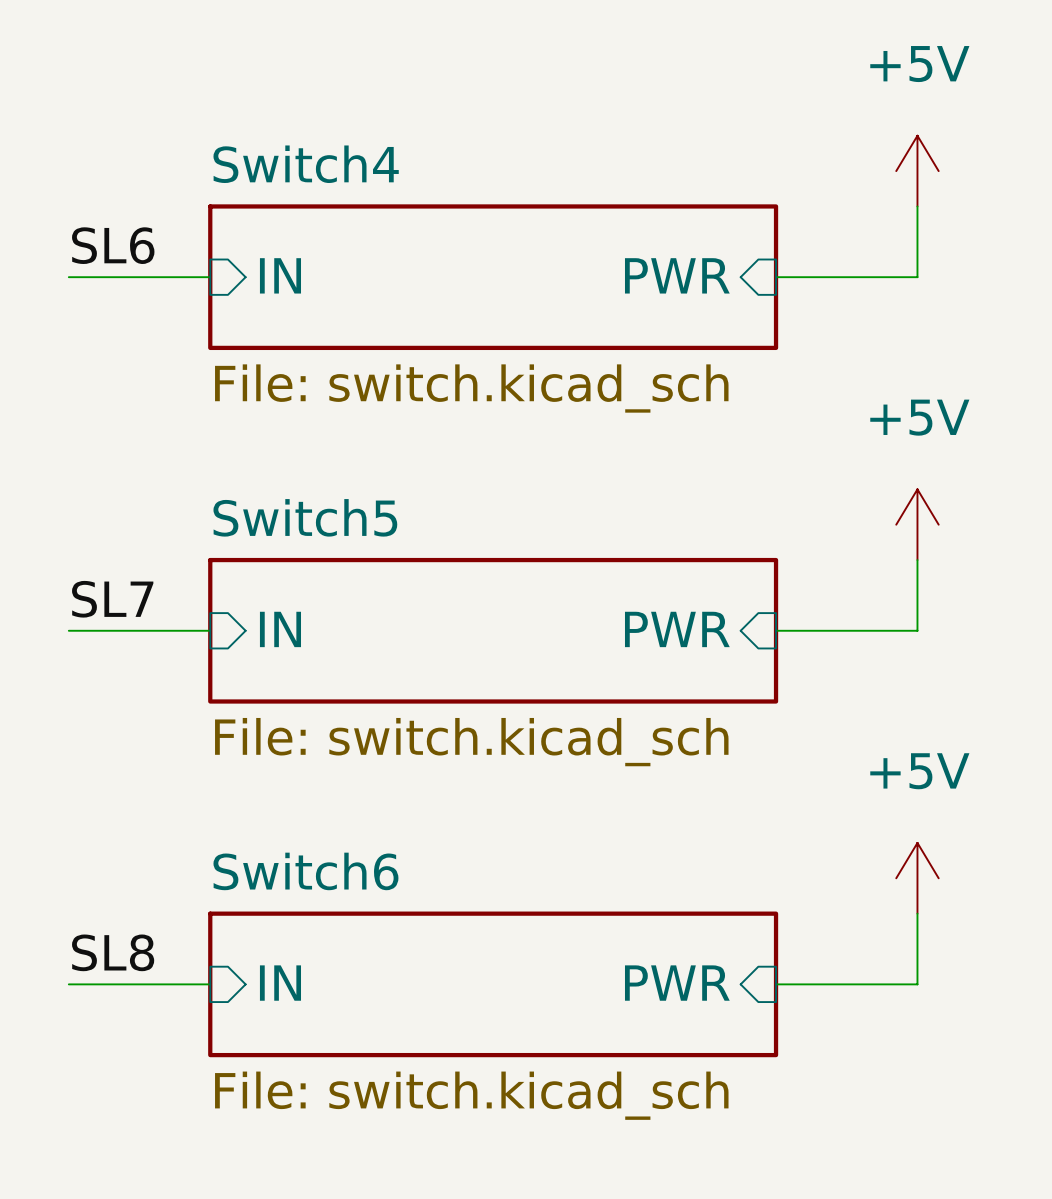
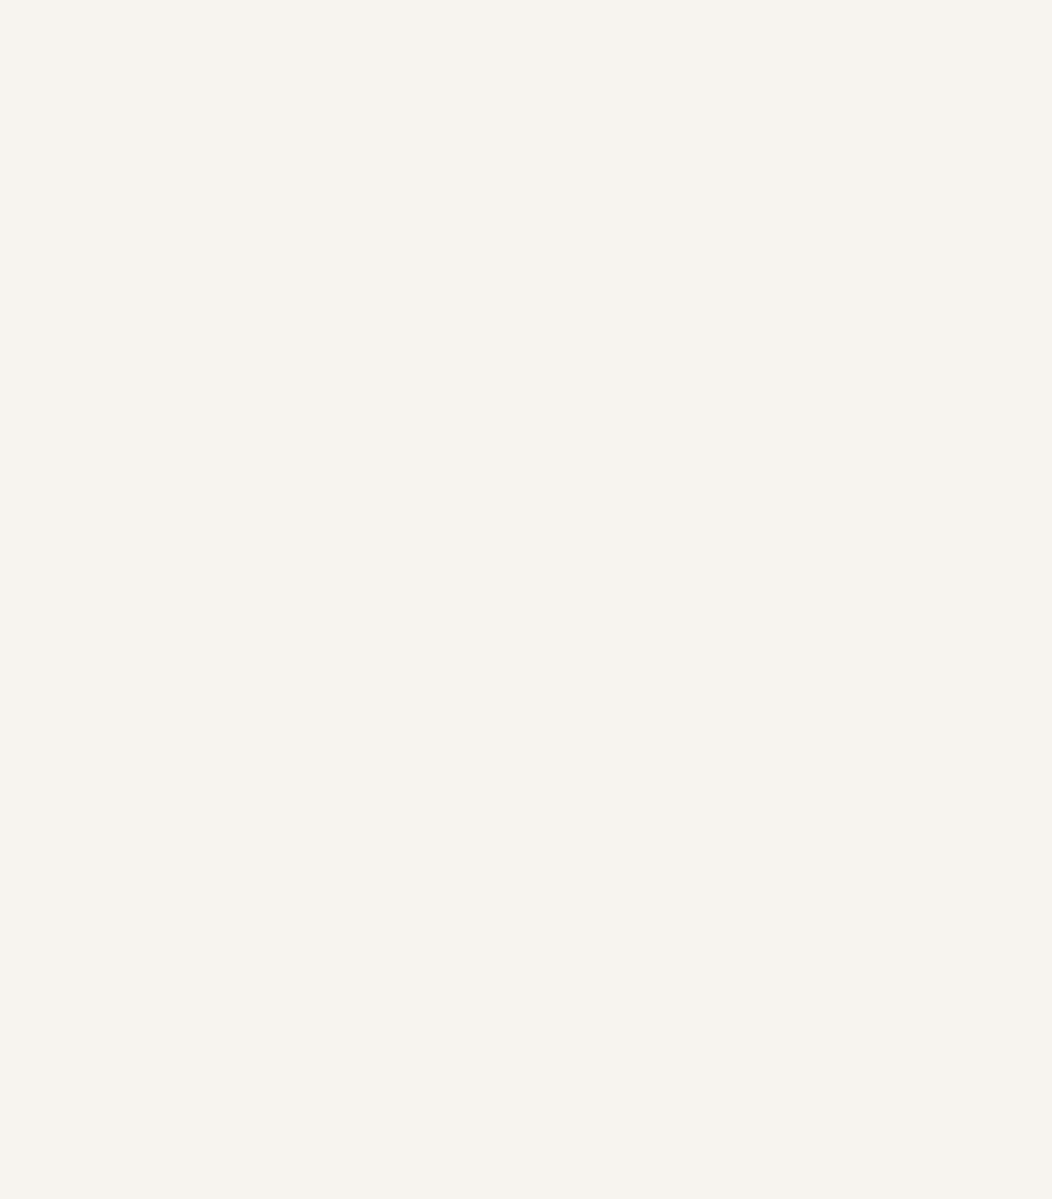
power symbol: +5V (917, 171) -> none
wire: (917, 206) (917, 277) (776, 277) -> none
label: SL6 (113, 245) -> none
sheet pin: IN (280, 275) -> none
sheet pin: PWR (677, 275) -> none
wire: (68, 277) (210, 277) -> none
sheet Switch4: File: switch.kicad_sch (493, 277) -> none
power symbol: +5V (917, 524) -> none
wire: (917, 560) (917, 630) (776, 630) -> none
label: SL7 (112, 599) -> none
sheet pin: IN (280, 629) -> none
sheet pin: PWR (677, 629) -> none
wire: (68, 630) (210, 630) -> none
sheet Switch5: File: switch.kicad_sch (493, 630) -> none
power symbol: +5V (917, 878) -> none
wire: (917, 913) (917, 984) (776, 984) -> none
label: SL8 (113, 952) -> none
sheet pin: IN (280, 983) -> none
sheet pin: PWR (677, 983) -> none
wire: (68, 984) (210, 984) -> none
sheet Switch6: File: switch.kicad_sch (493, 984) -> none

